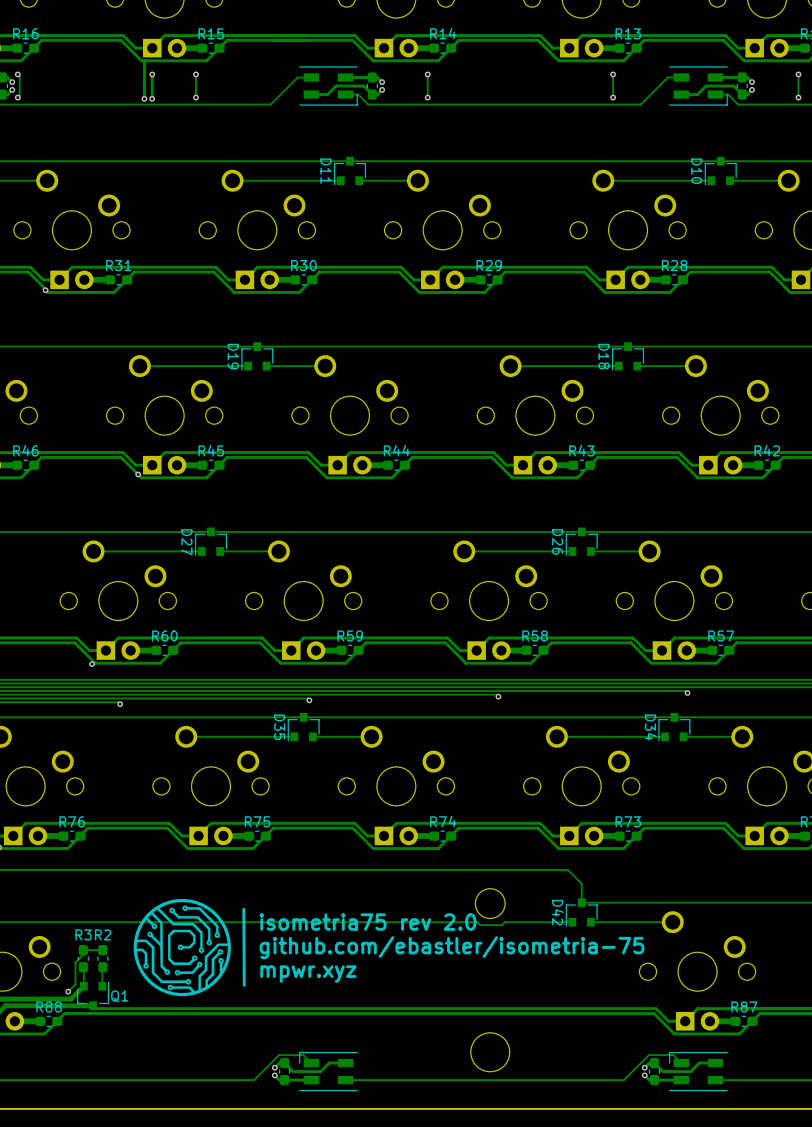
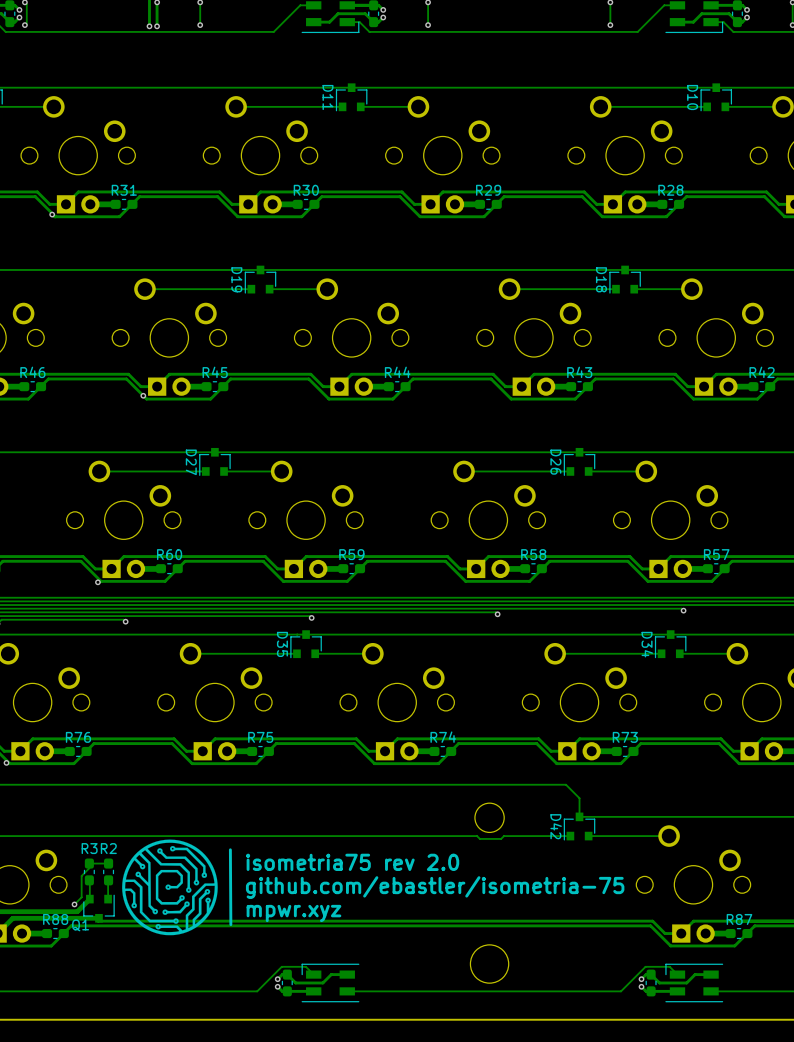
line: (243, 909) (244, 985) -> (230, 849) (230, 924)
text position: isometria75 rev 2.0 (368, 922) -> isometria75 rev 2.0 (352, 862)
drawing position: (182, 947) -> (169, 887)
text position: github.com/ebastler/isometria-75 (452, 947) -> github.com/ebastler/isometria-75 (435, 887)
text position: mpwr.xyz (308, 974) -> mpwr.xyz (293, 913)
Q1 name position: Q1 (119, 996) -> Q1 (80, 925)

